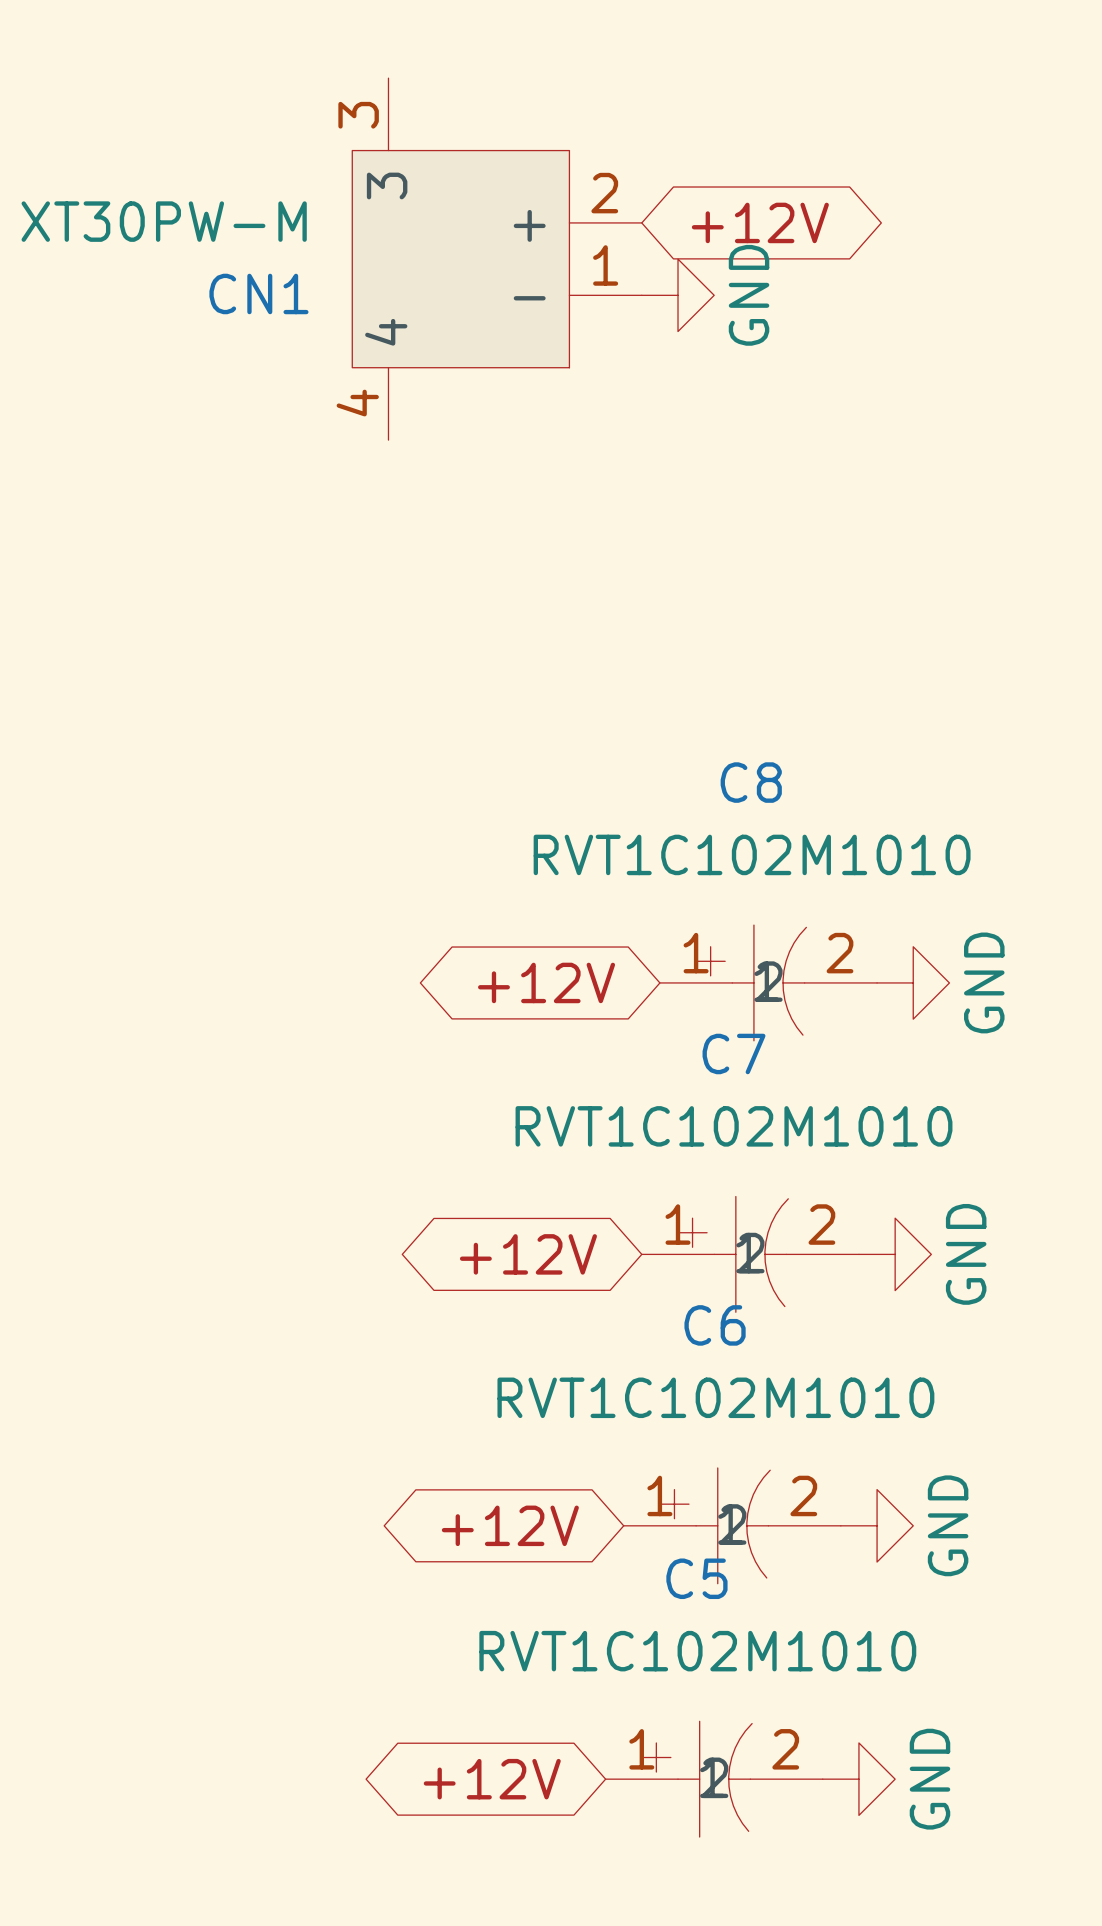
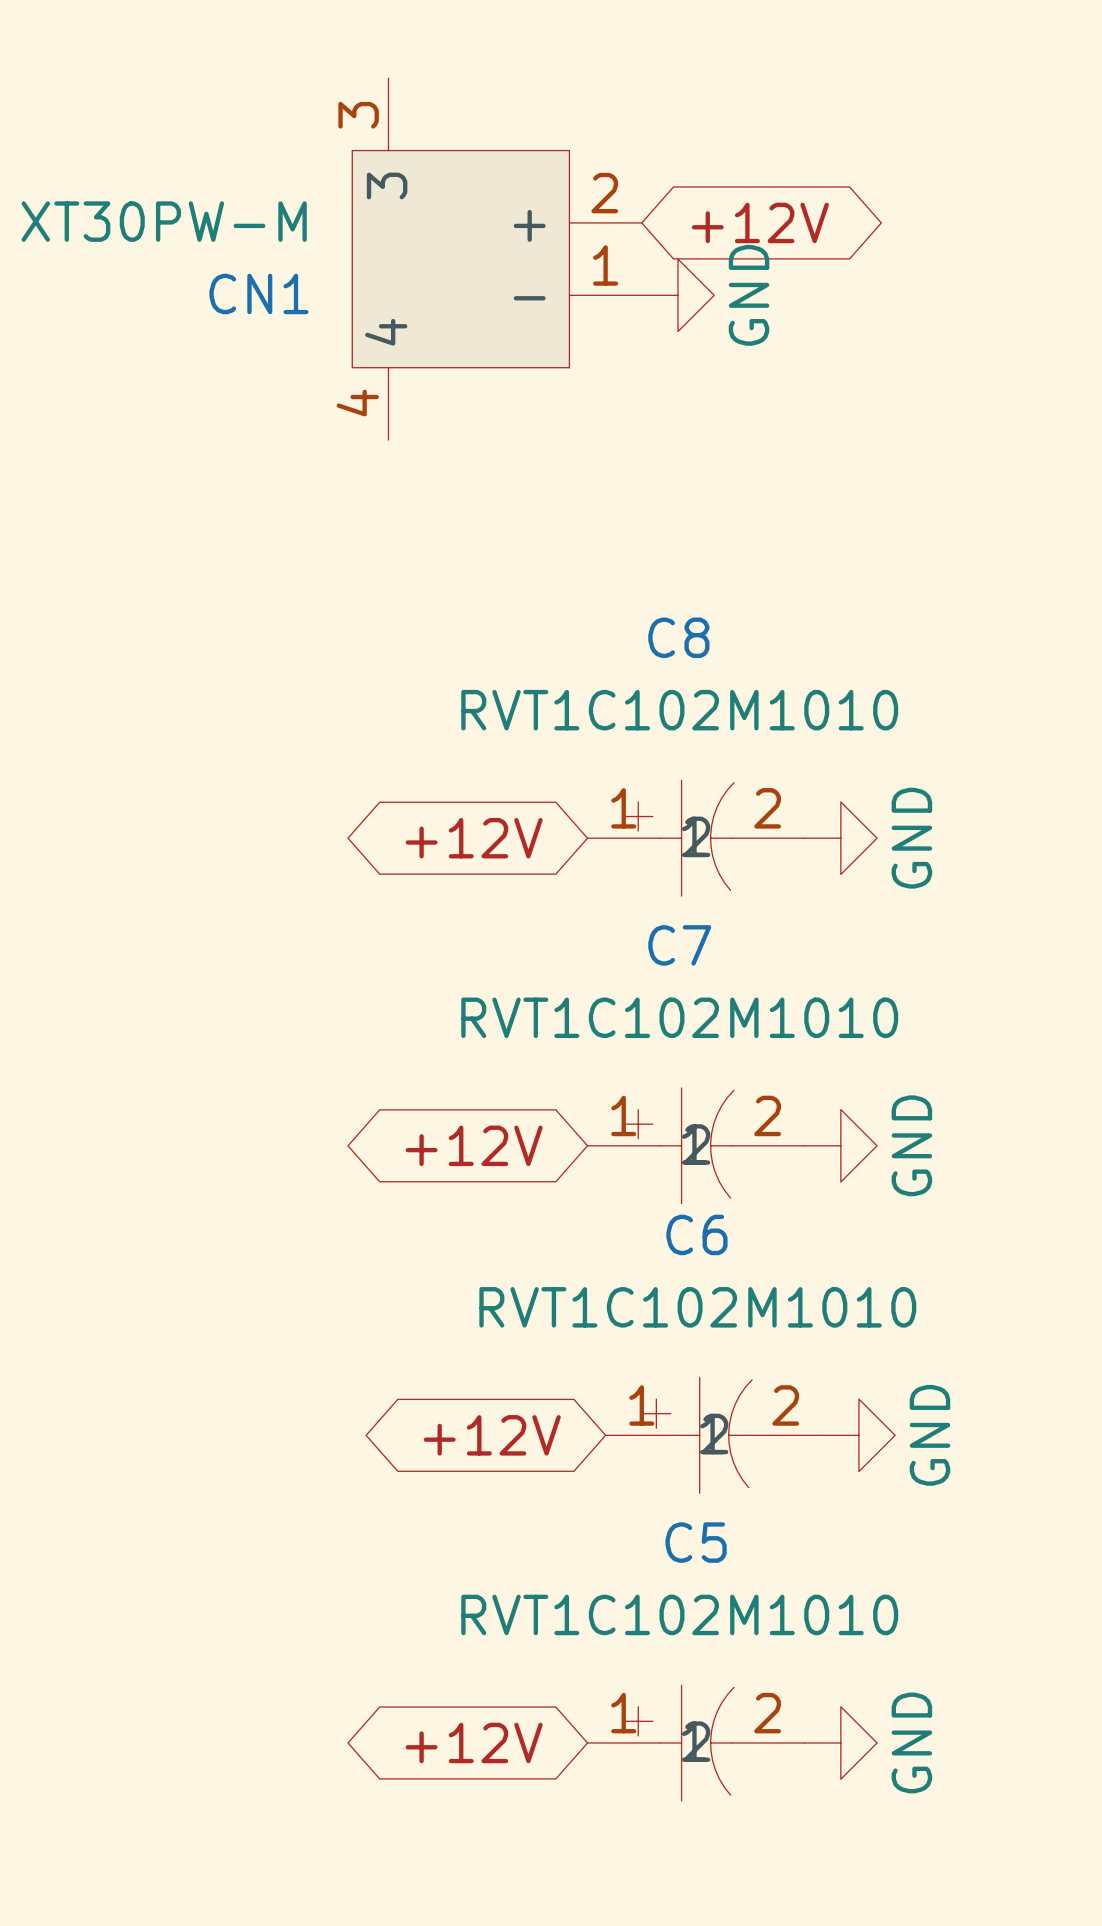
global label: none -> +12V (474, 838)
power symbol: none -> GND (840, 838)
global label: +12V (546, 982) -> none
C8 position: (768, 982) -> (696, 838)
power symbol: GND (913, 982) -> none
global label: none -> +12V (474, 1145)
power symbol: none -> GND (840, 1145)
global label: +12V (528, 1254) -> none
C7 position: (750, 1254) -> (696, 1145)
power symbol: GND (895, 1254) -> none
global label: none -> +12V (492, 1435)
power symbol: none -> GND (858, 1435)
global label: +12V (510, 1525) -> none
C6 position: (732, 1525) -> (714, 1435)
power symbol: GND (877, 1525) -> none
C5 name position: C5 (696, 1578) -> C5 (696, 1542)
global label position: +12V (492, 1779) -> +12V (474, 1742)
C5 position: (714, 1779) -> (696, 1742)
power symbol position: GND (858, 1779) -> GND (840, 1742)

